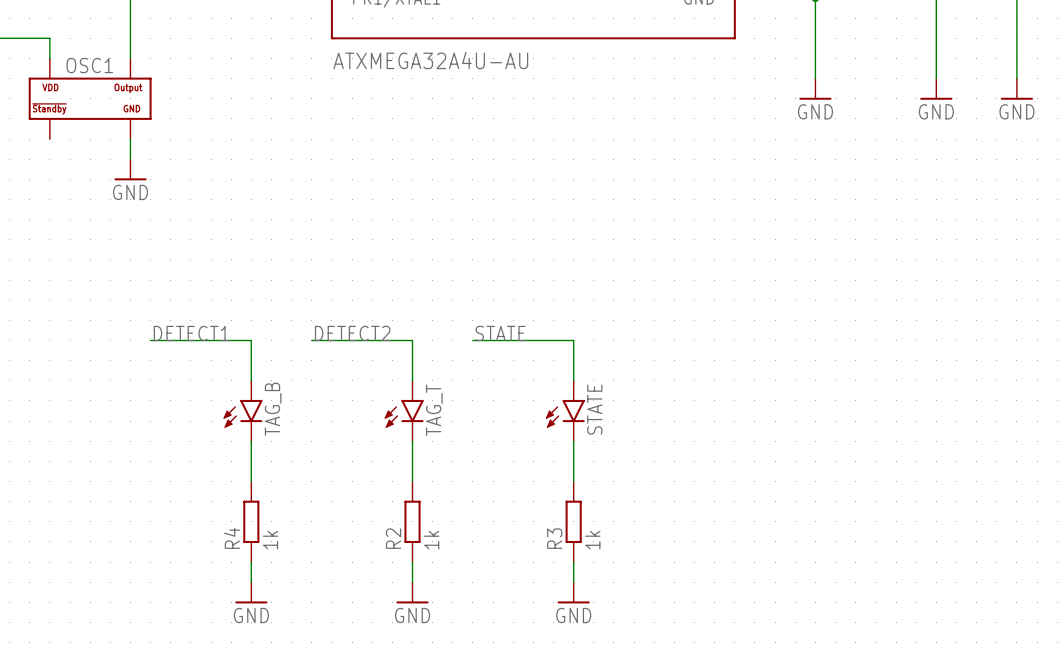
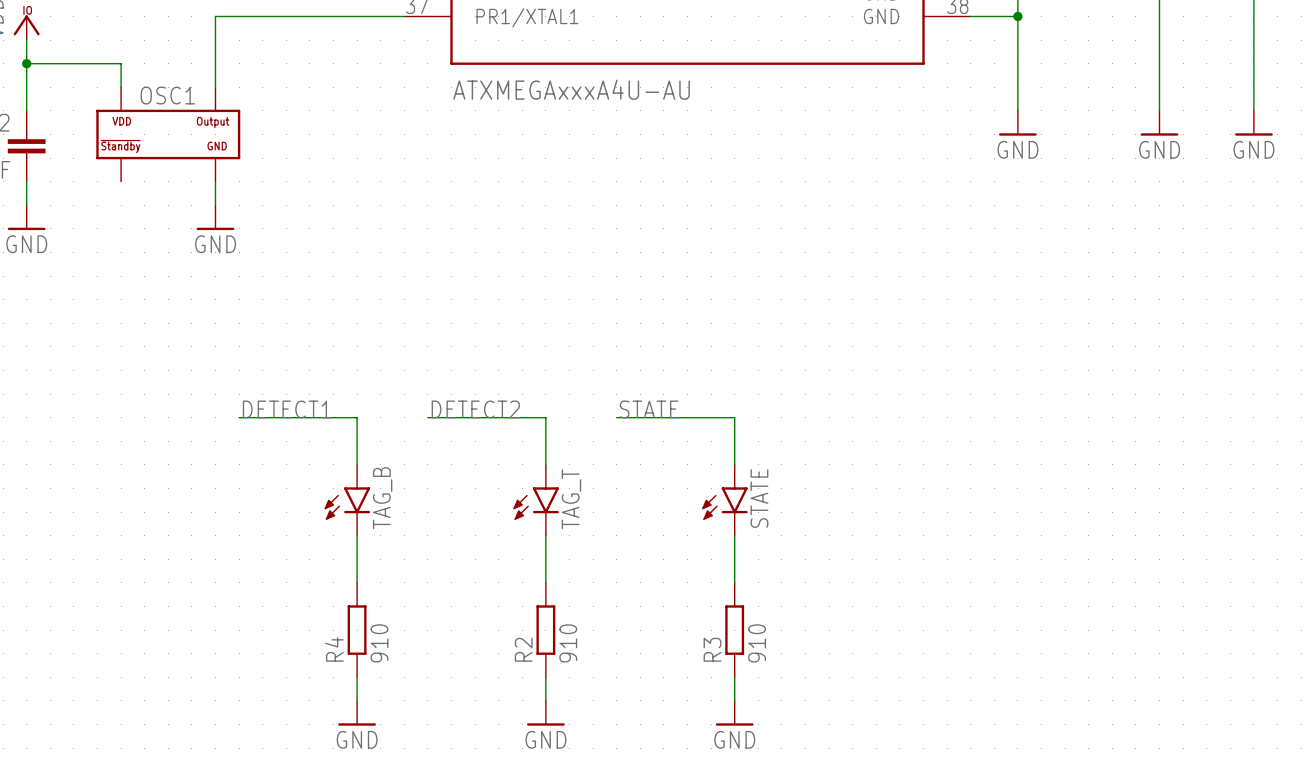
part value: ATXMEGA32A4U-AU (430, 60) -> ATXMEGAxxxA4U-AU (571, 89)
R4 value: 1k (270, 540) -> 910 (379, 643)
R2 value: 1k (431, 540) -> 910 (568, 643)
R3 value: 1k (592, 540) -> 910 (757, 643)

